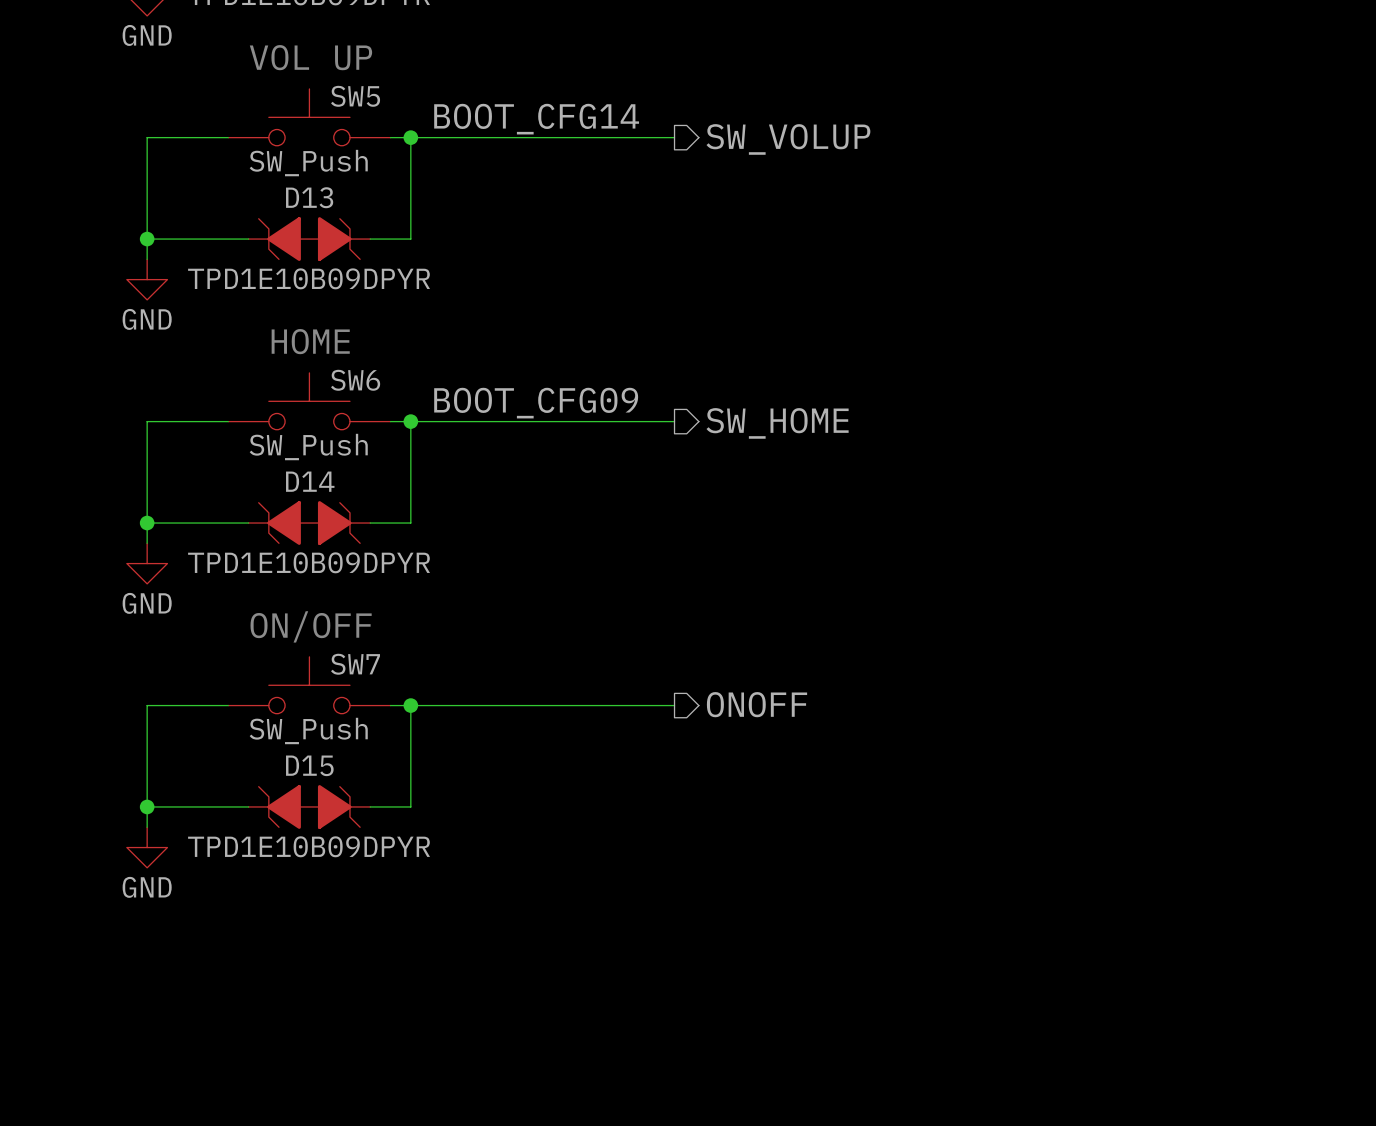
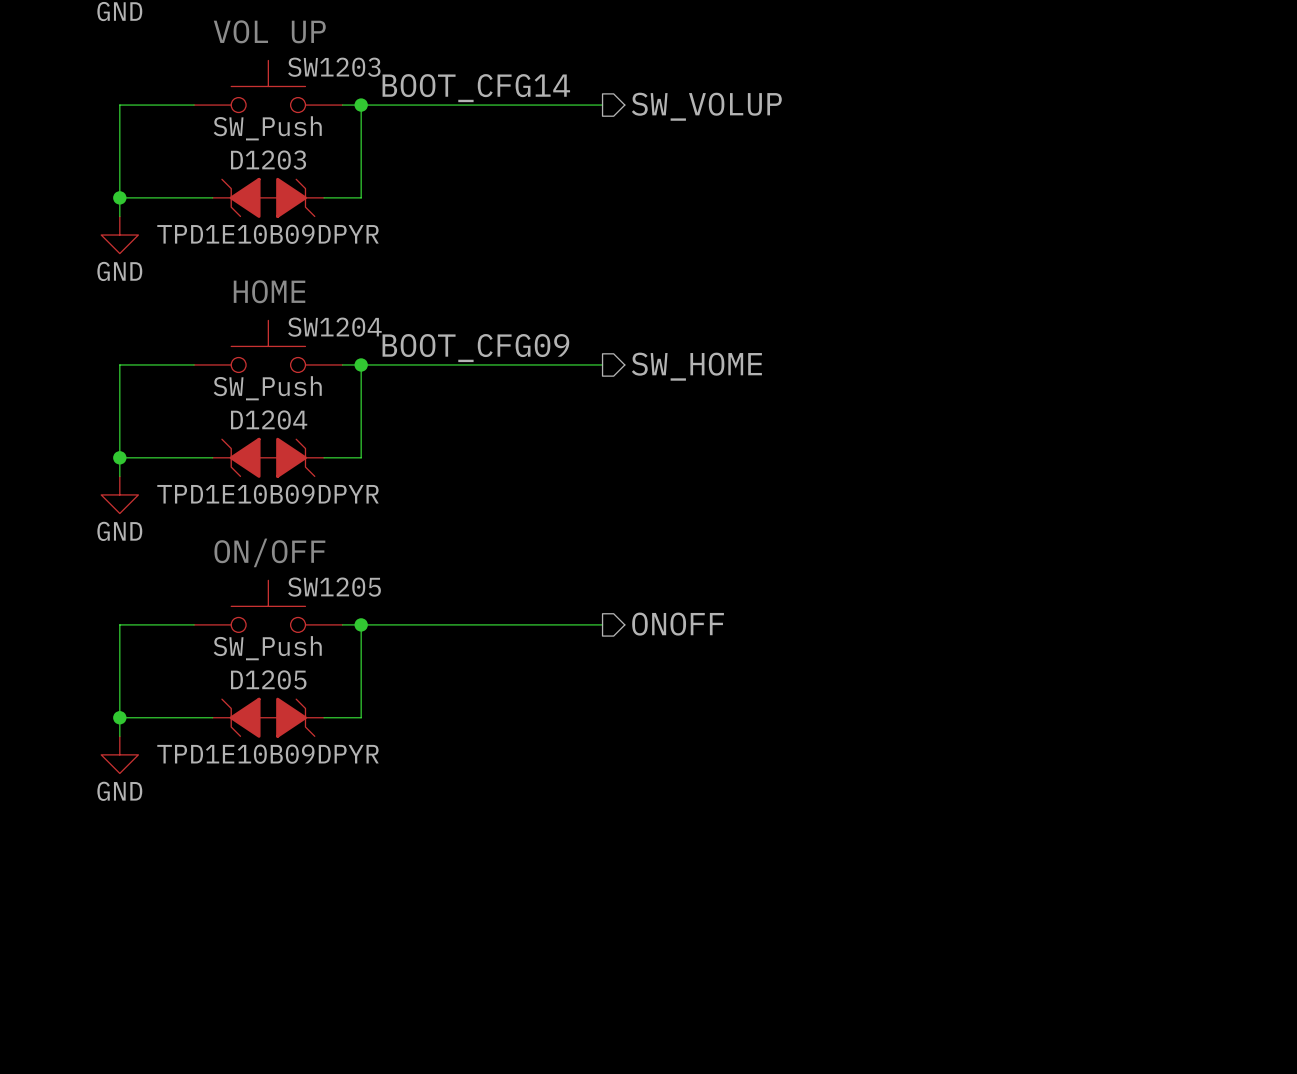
SW5 name: SW5 (355, 96) -> SW1203 (334, 67)
D13 name: D13 (309, 197) -> D1203 (268, 160)
SW6 name: SW6 (355, 380) -> SW1204 (334, 327)
D14 name: D14 (310, 481) -> D1204 (269, 419)
SW7 name: SW7 (355, 664) -> SW1205 (334, 587)
D15 name: D15 (309, 765) -> D1205 (268, 679)

